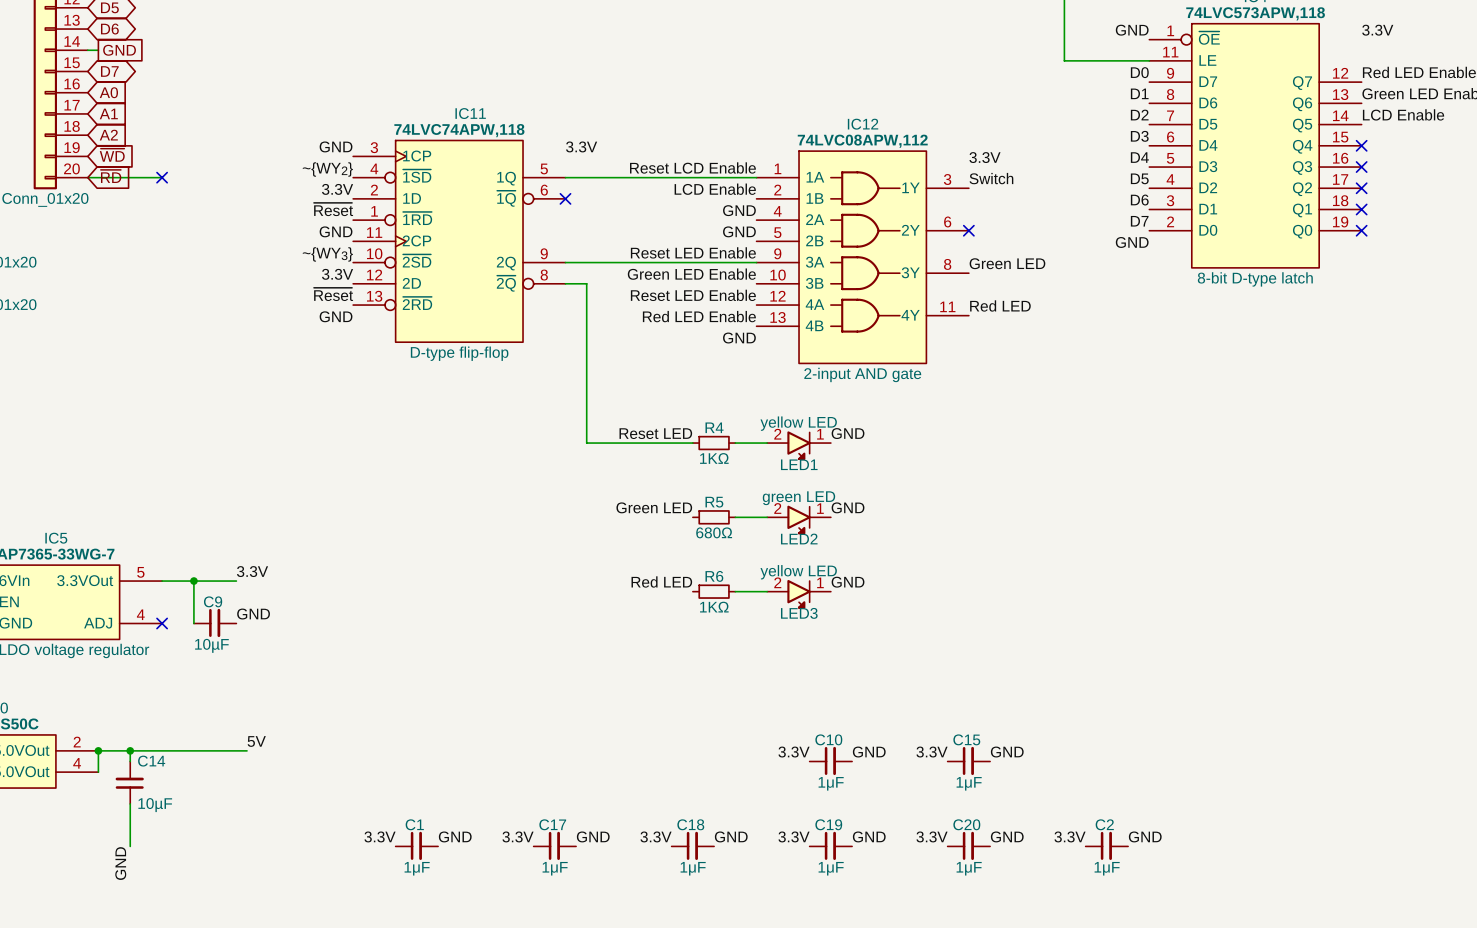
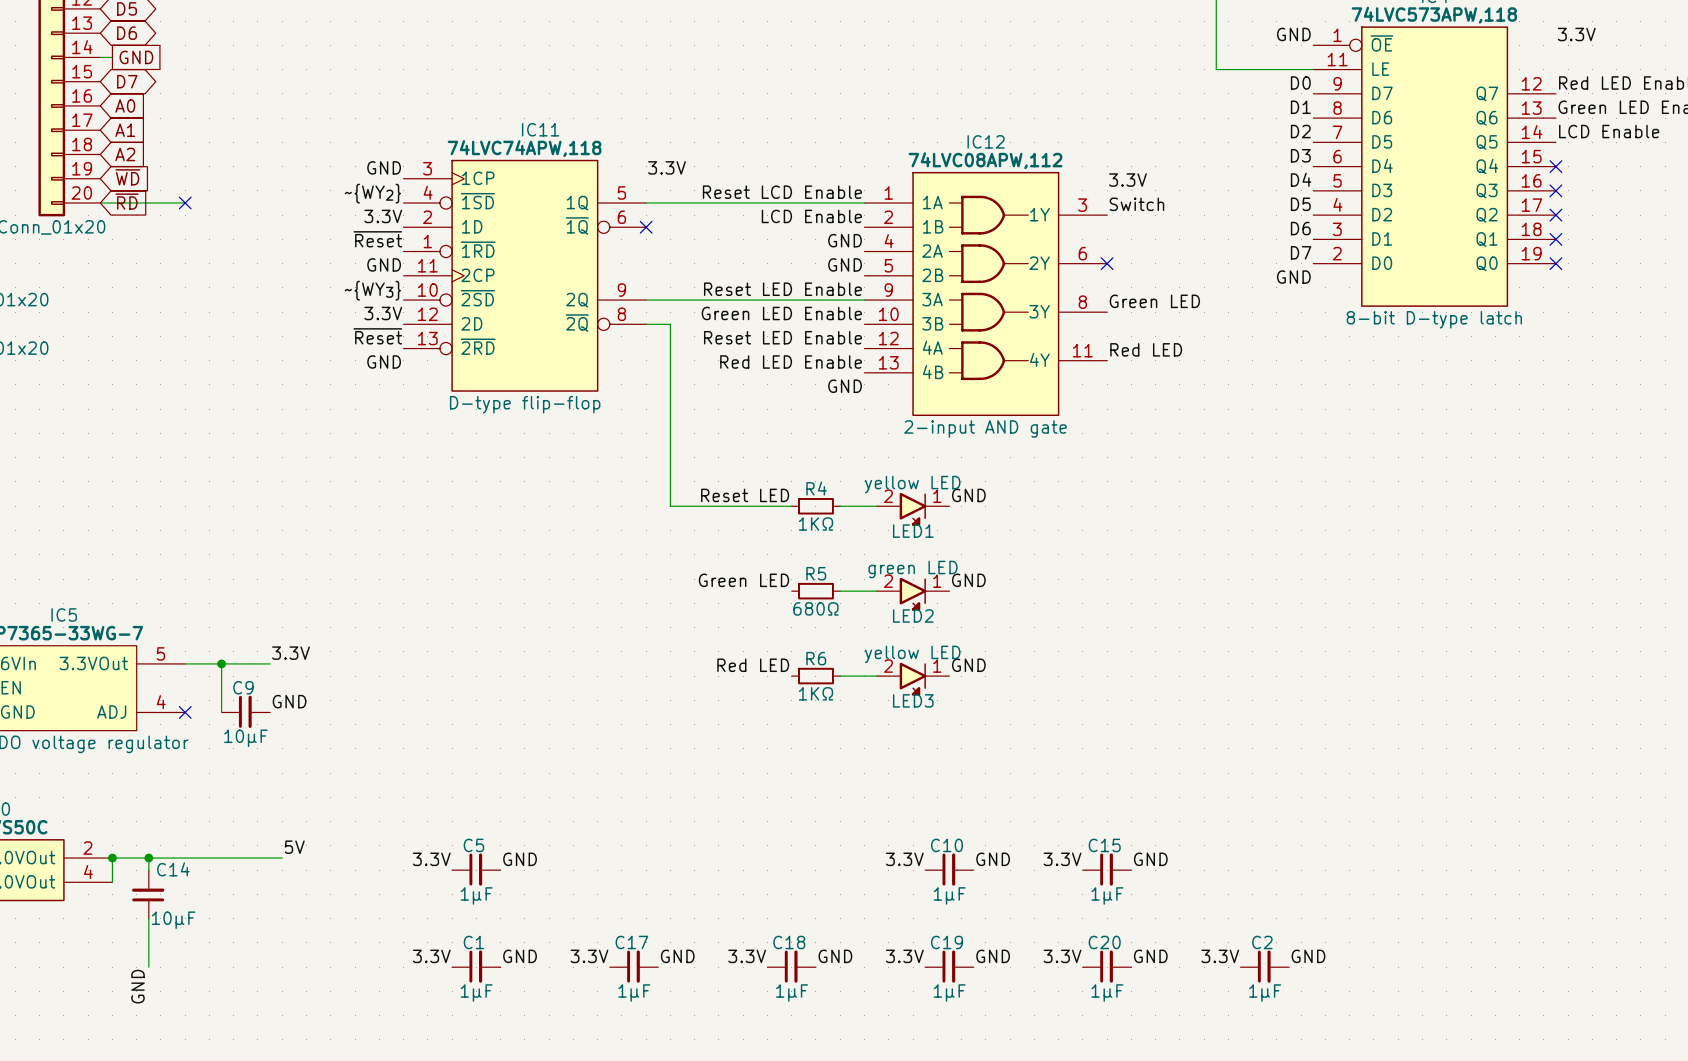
label: none -> 3.3V (431, 859)
label: none -> GND (520, 859)
C5: none -> 1μF (476, 869)

